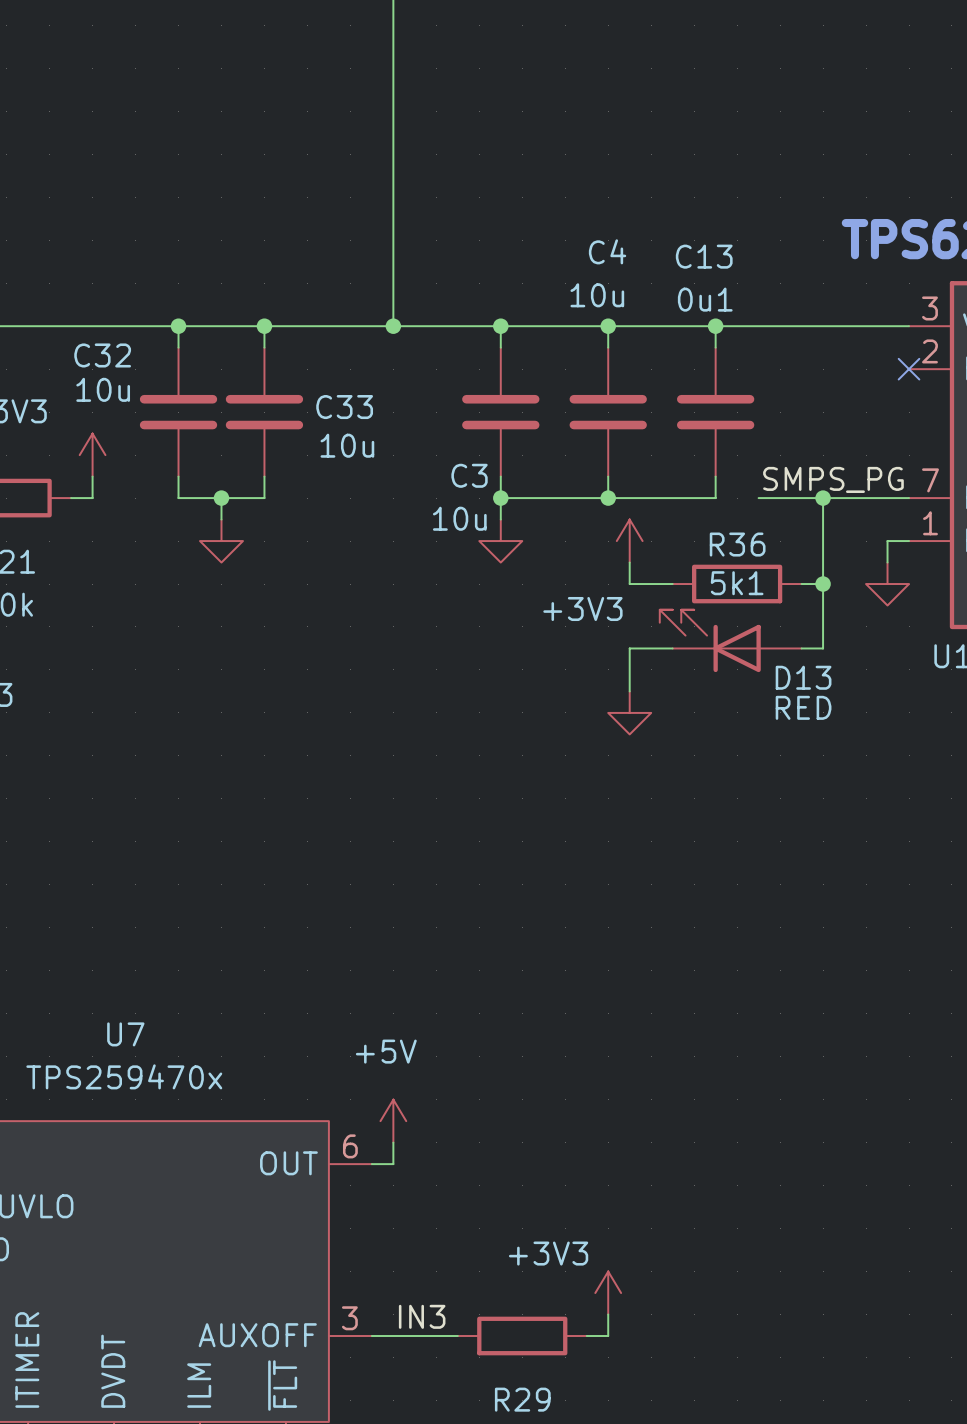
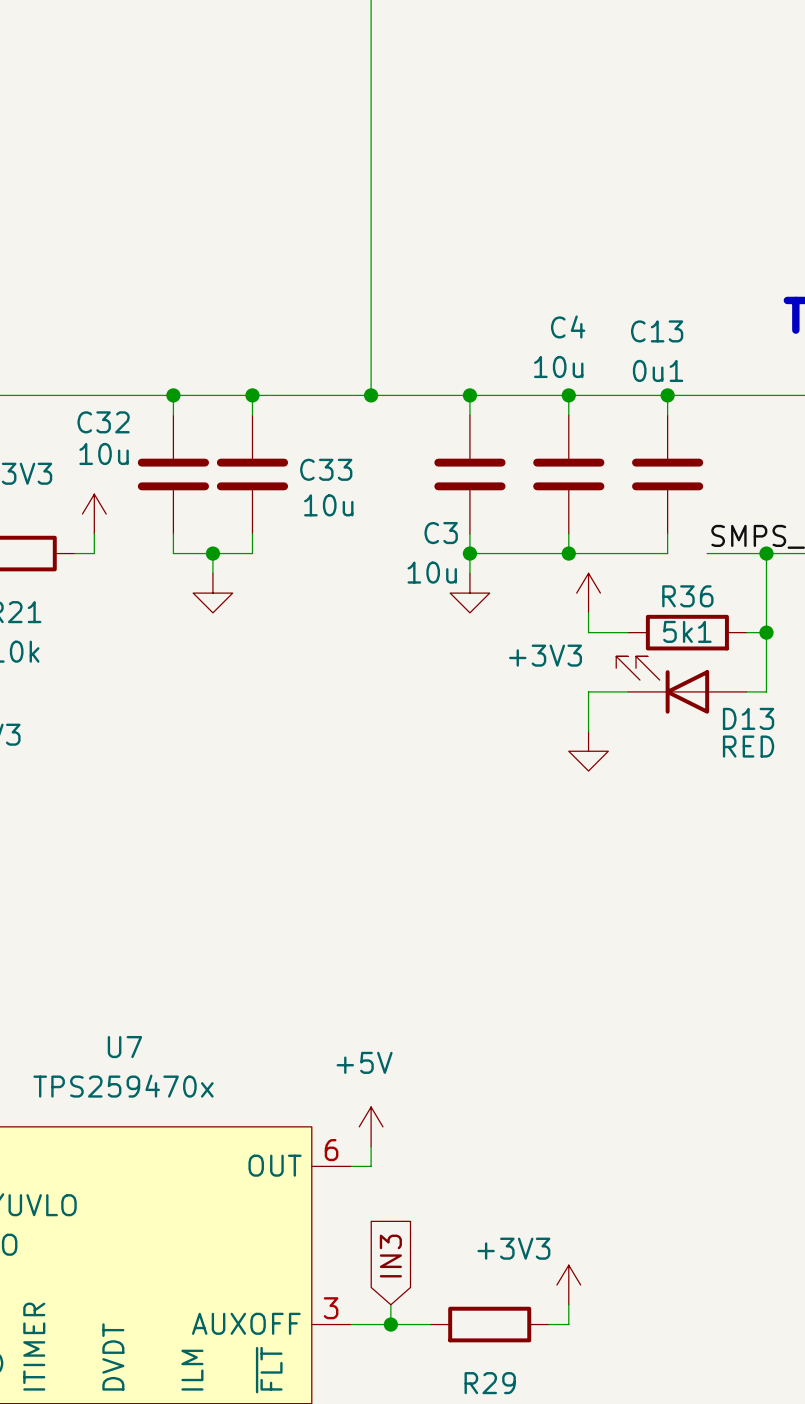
global label: none -> IN3 (390, 1256)
wire: none -> (390, 1304) (390, 1324)
label: IN3 (422, 1316) -> none
junction: none -> (390, 1324)

